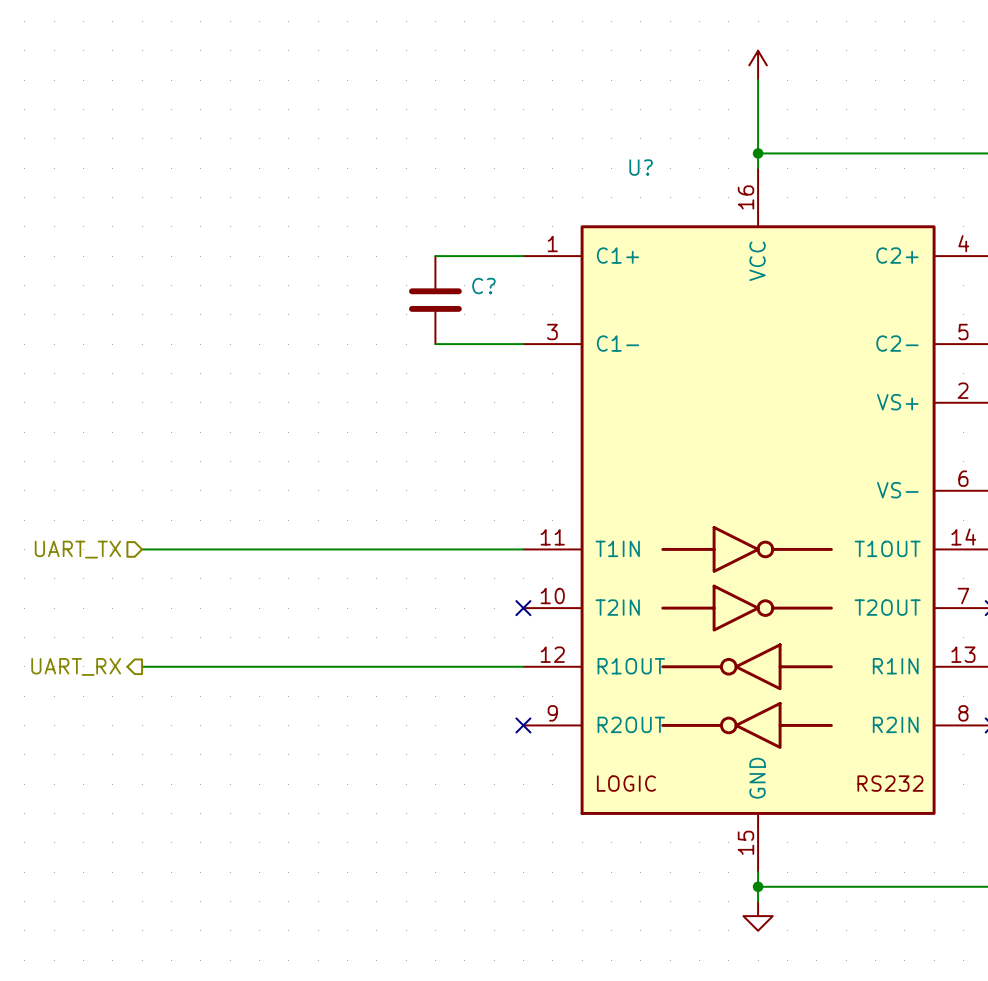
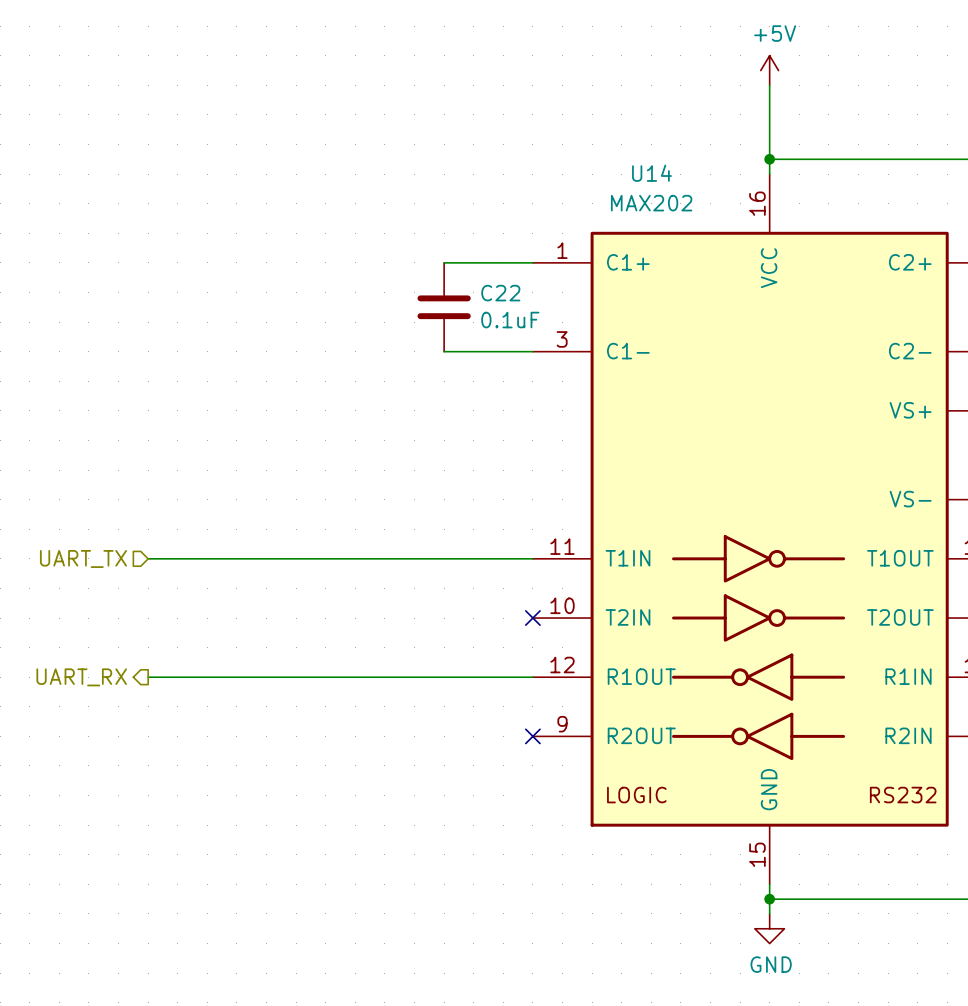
power symbol text: none -> +5V (775, 33)
U? name: U? (641, 167) -> U14 (651, 173)
U? value: none -> MAX202 (651, 203)
C? name: C? (483, 286) -> C22 (500, 293)
C? value: none -> 0.1uF (510, 320)
power symbol text: none -> GND (771, 964)

